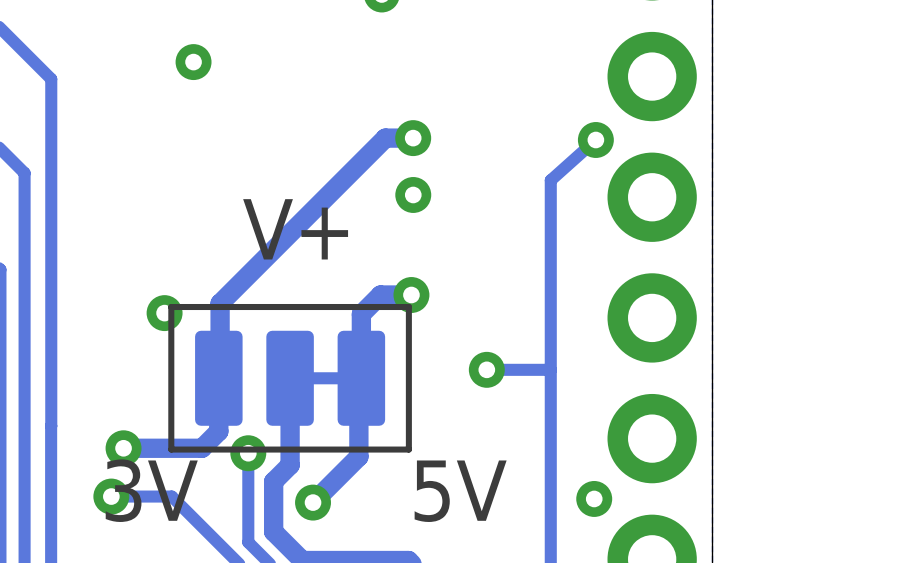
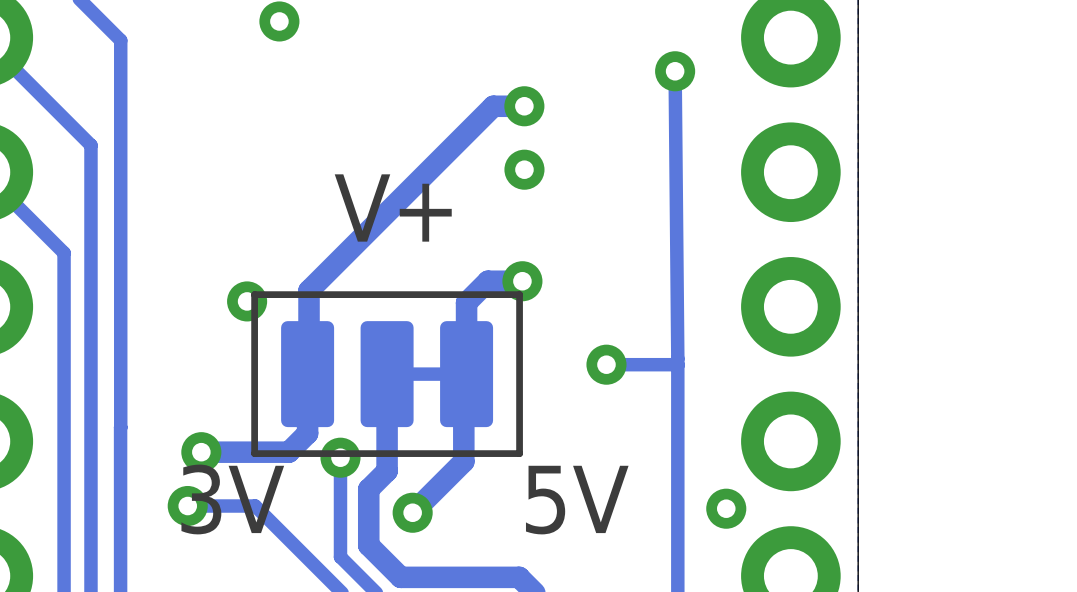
track: (595, 139) (550, 180) (550, 364) -> (675, 71) (677, 358)
via position: (595, 139) -> (675, 71)

